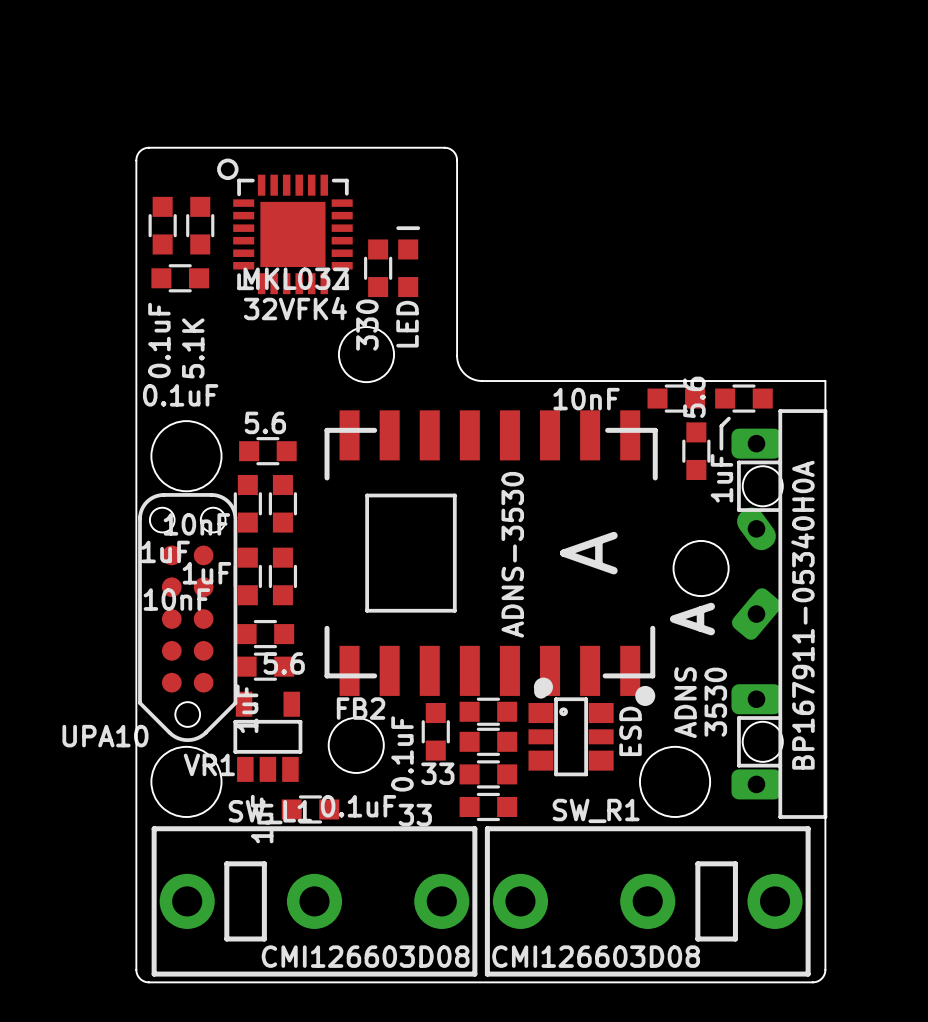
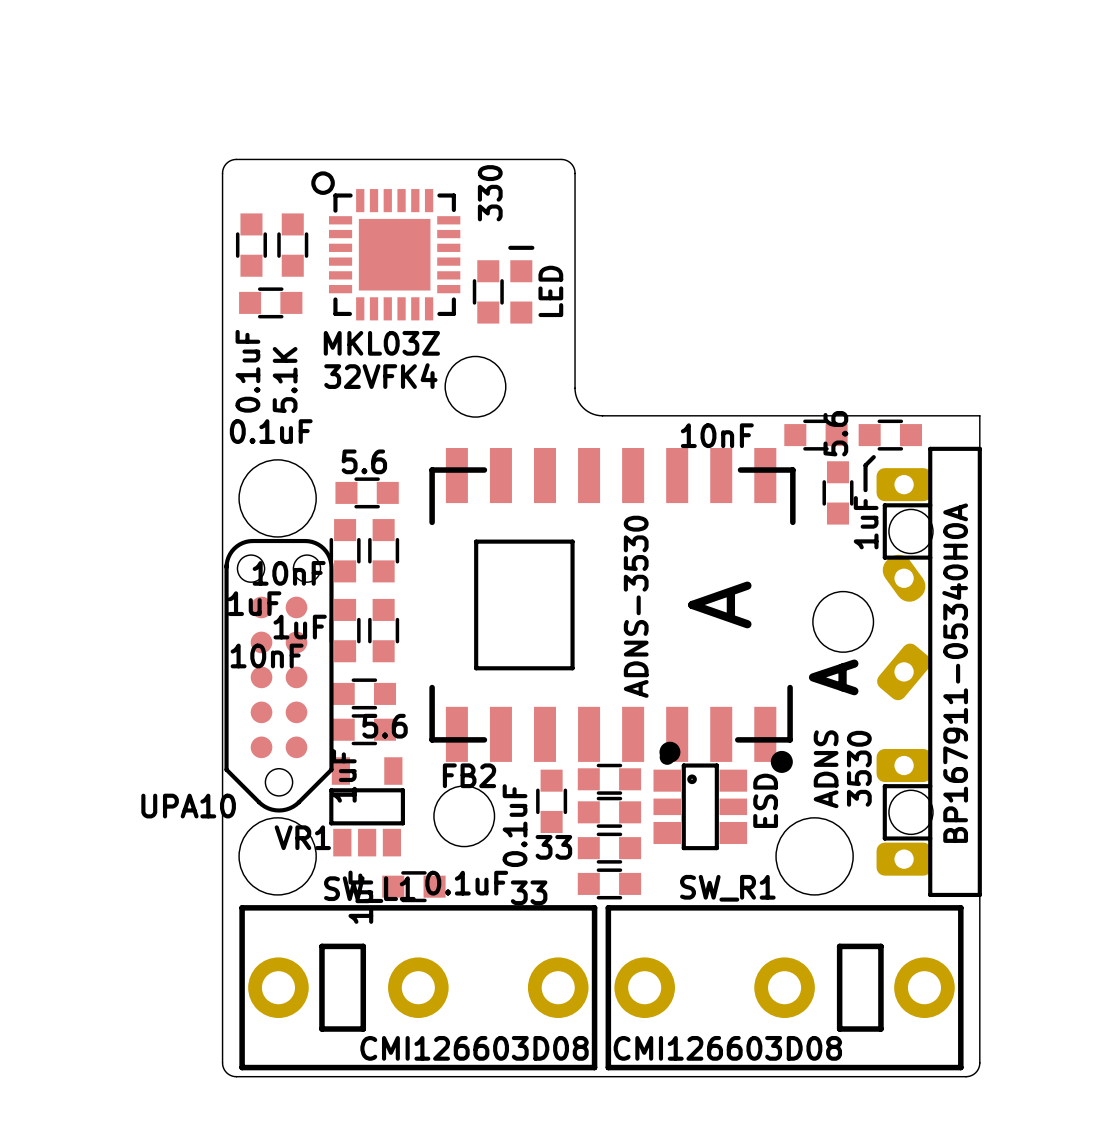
text: MKL03Z (296, 278) -> none
text: 32VFK4 (295, 308) -> MKL03Z (381, 343)
part value position: LED (407, 324) -> LED (550, 291)
part value position: 330 (367, 325) -> 330 (490, 193)
text: none -> 32VFK4 (380, 376)

